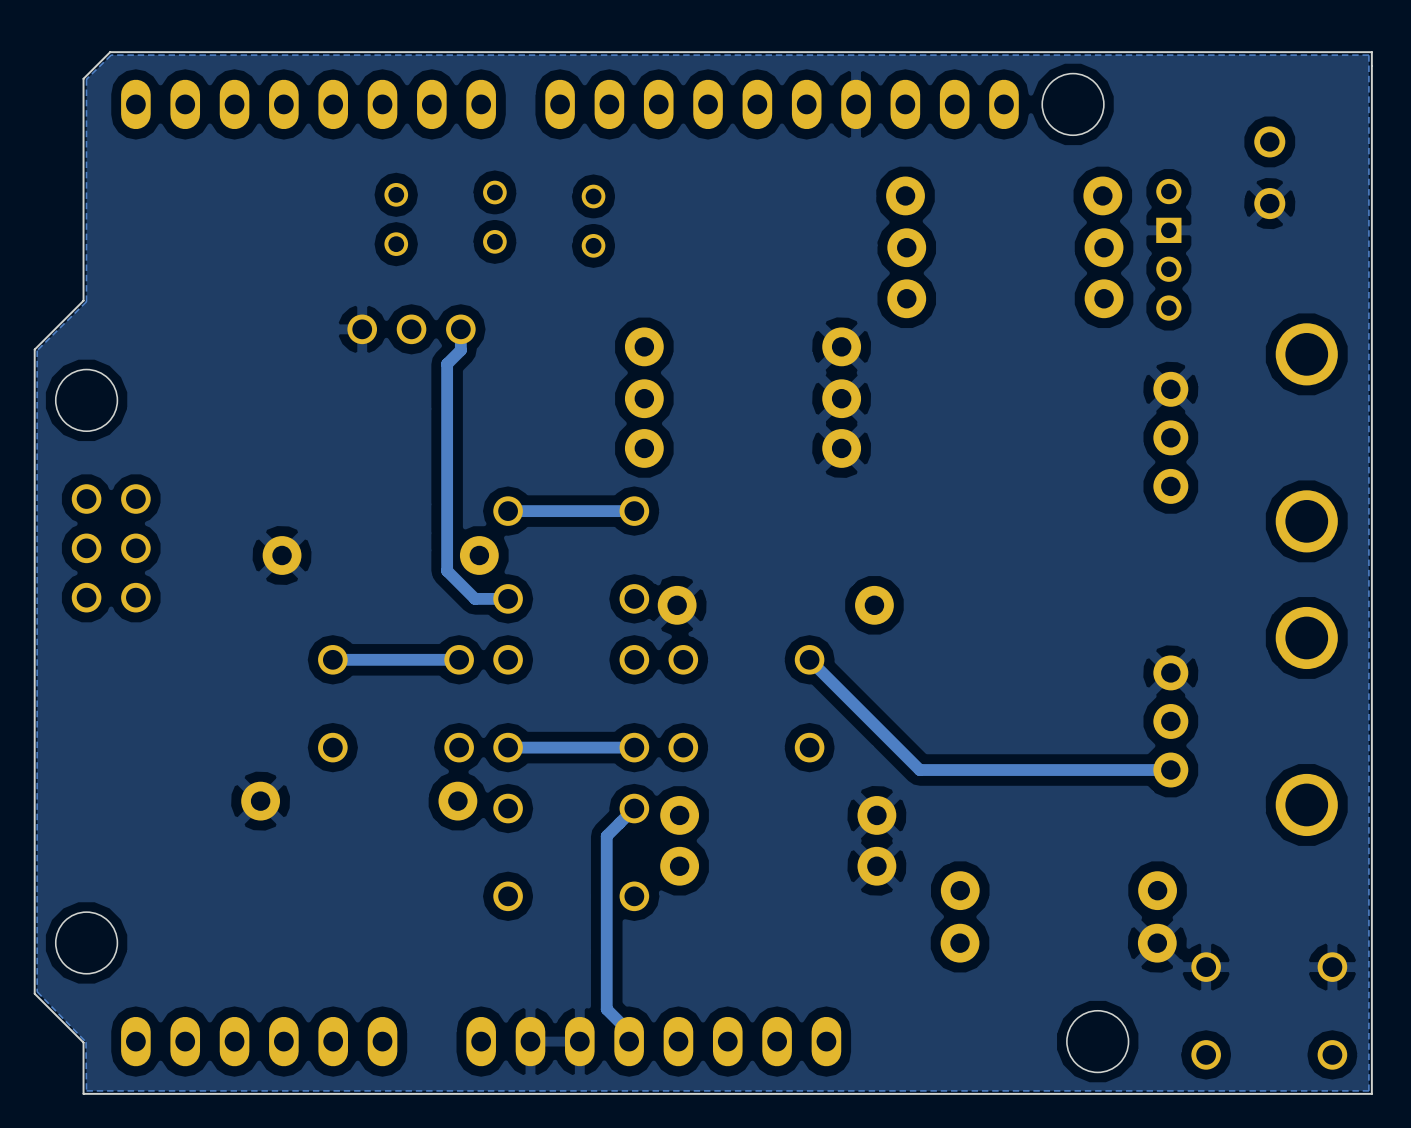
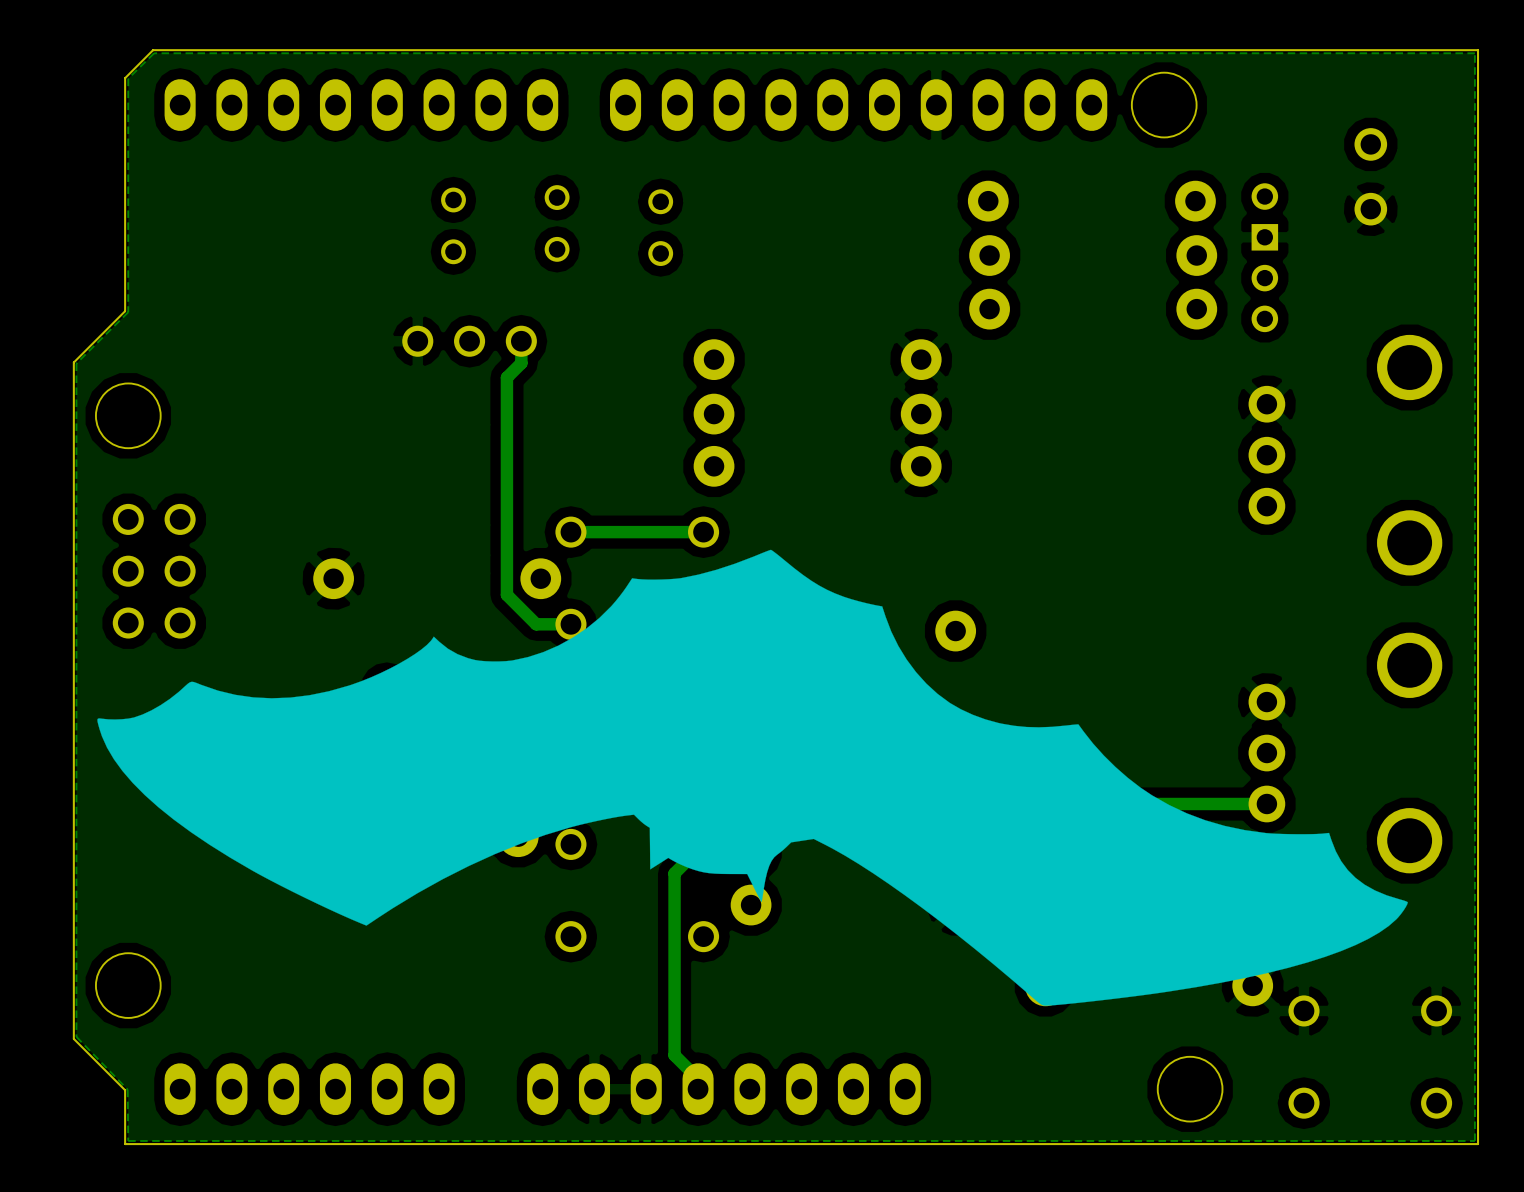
drawing: none -> [97, 549, 1408, 1006]

